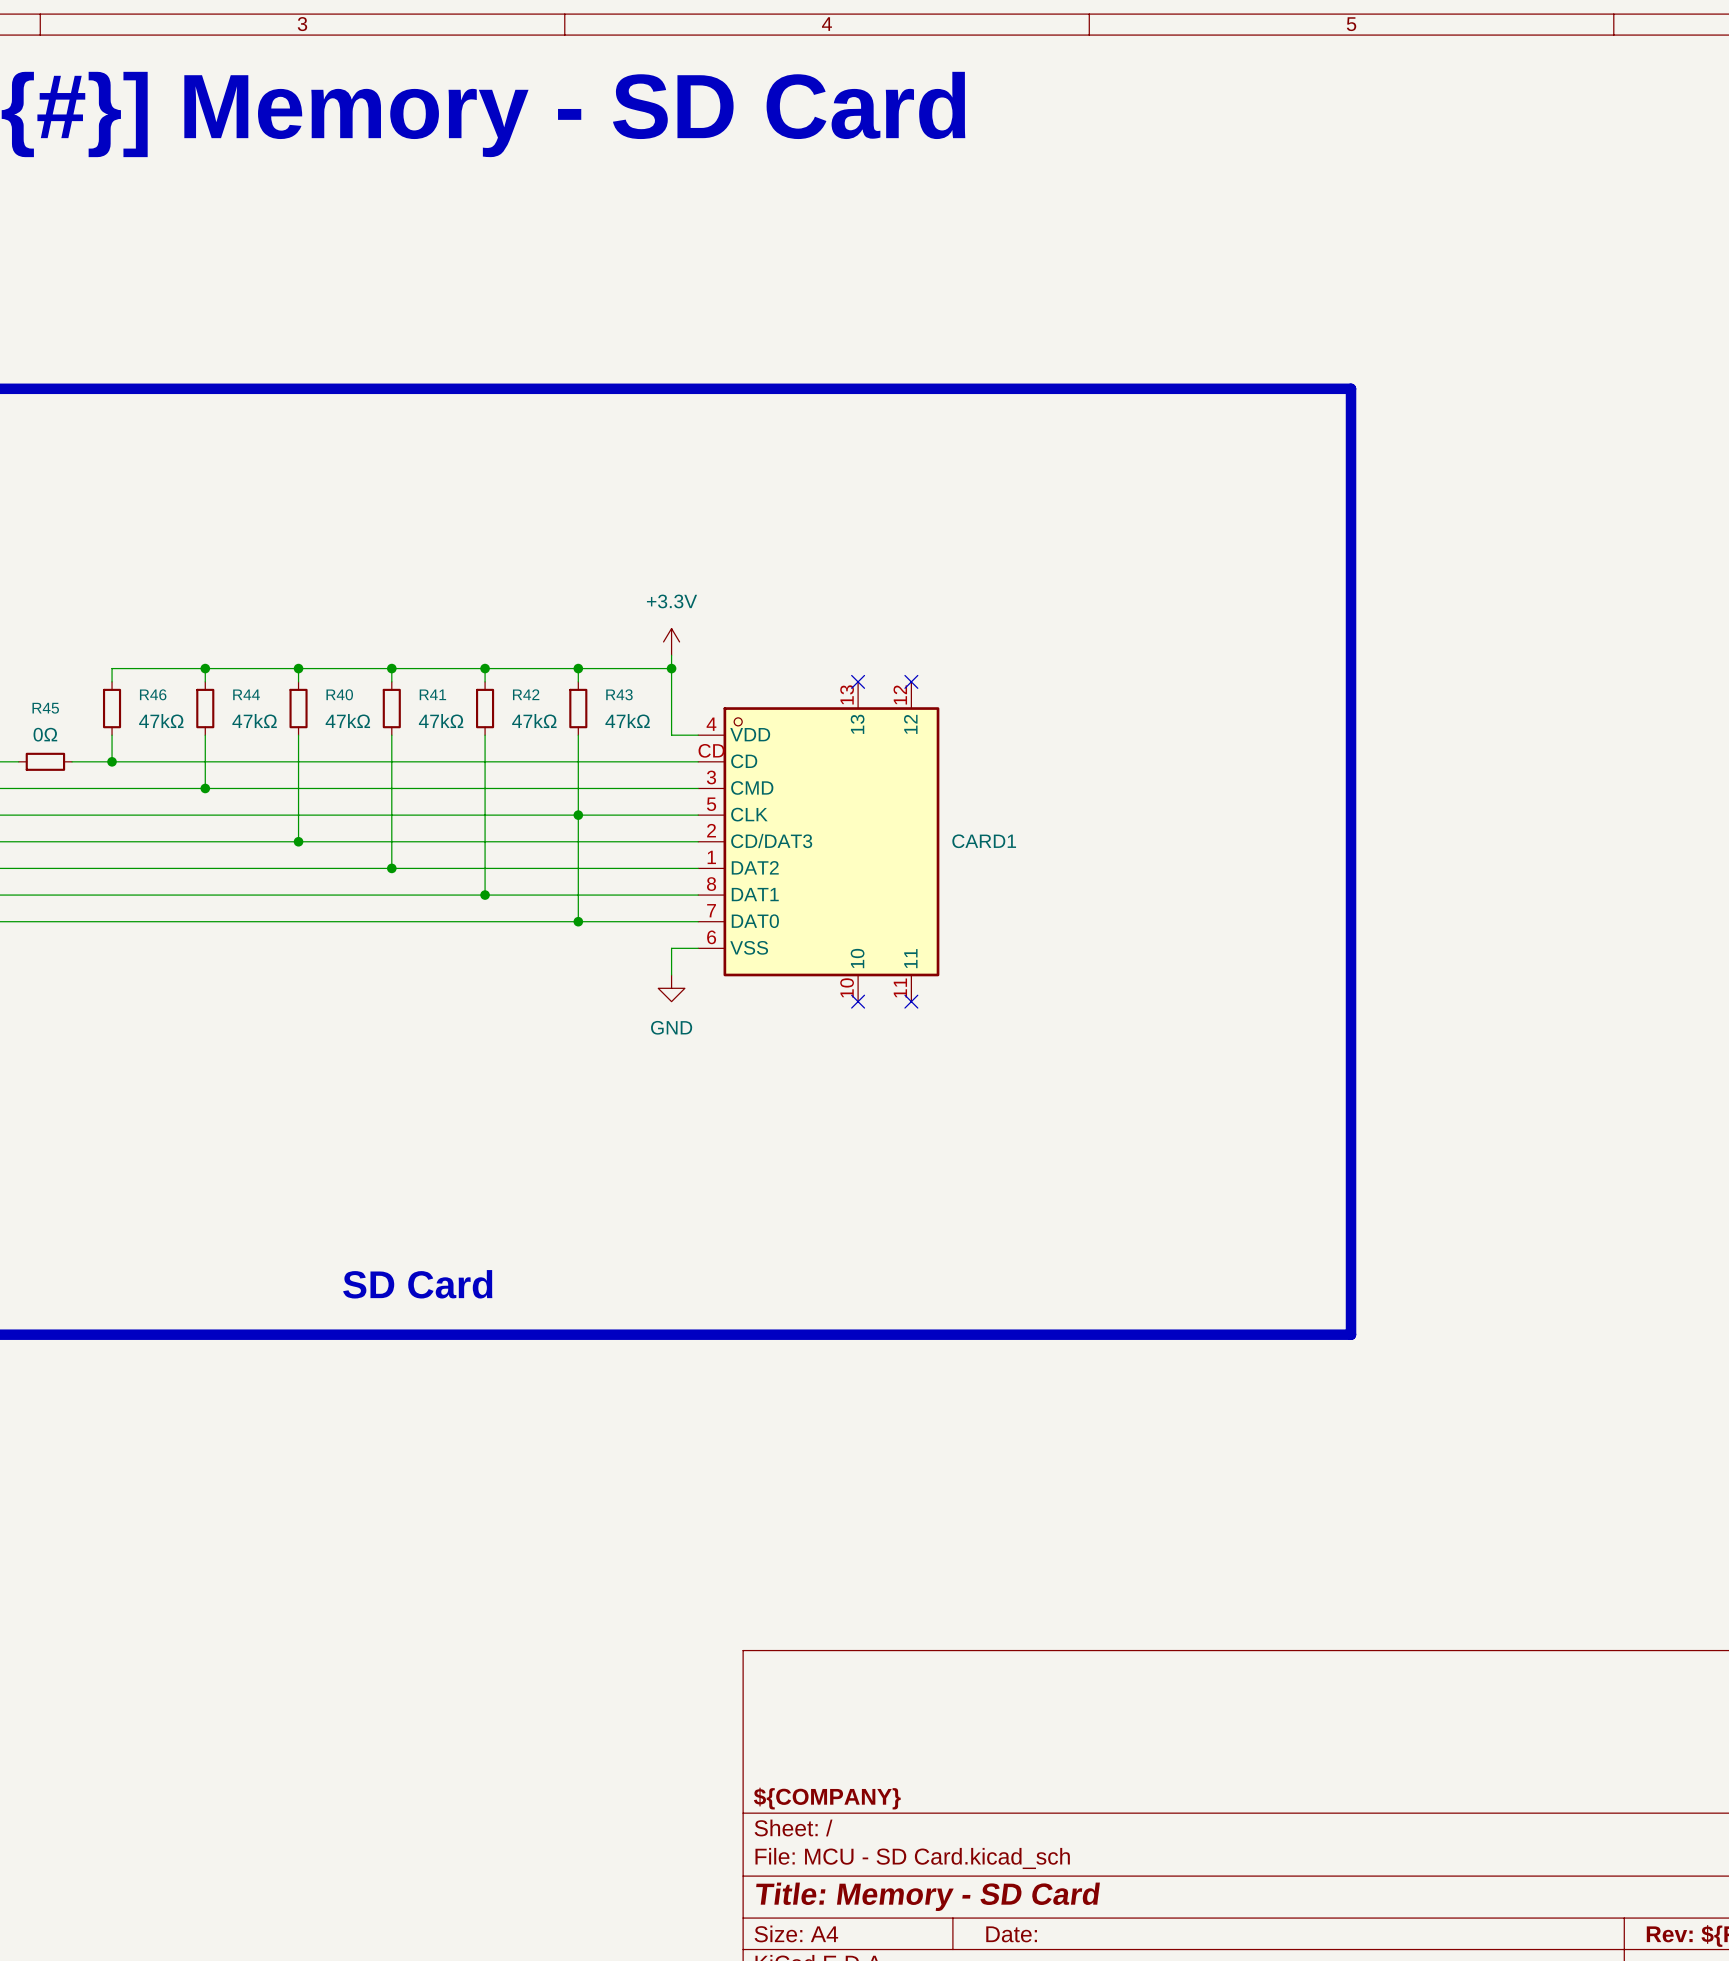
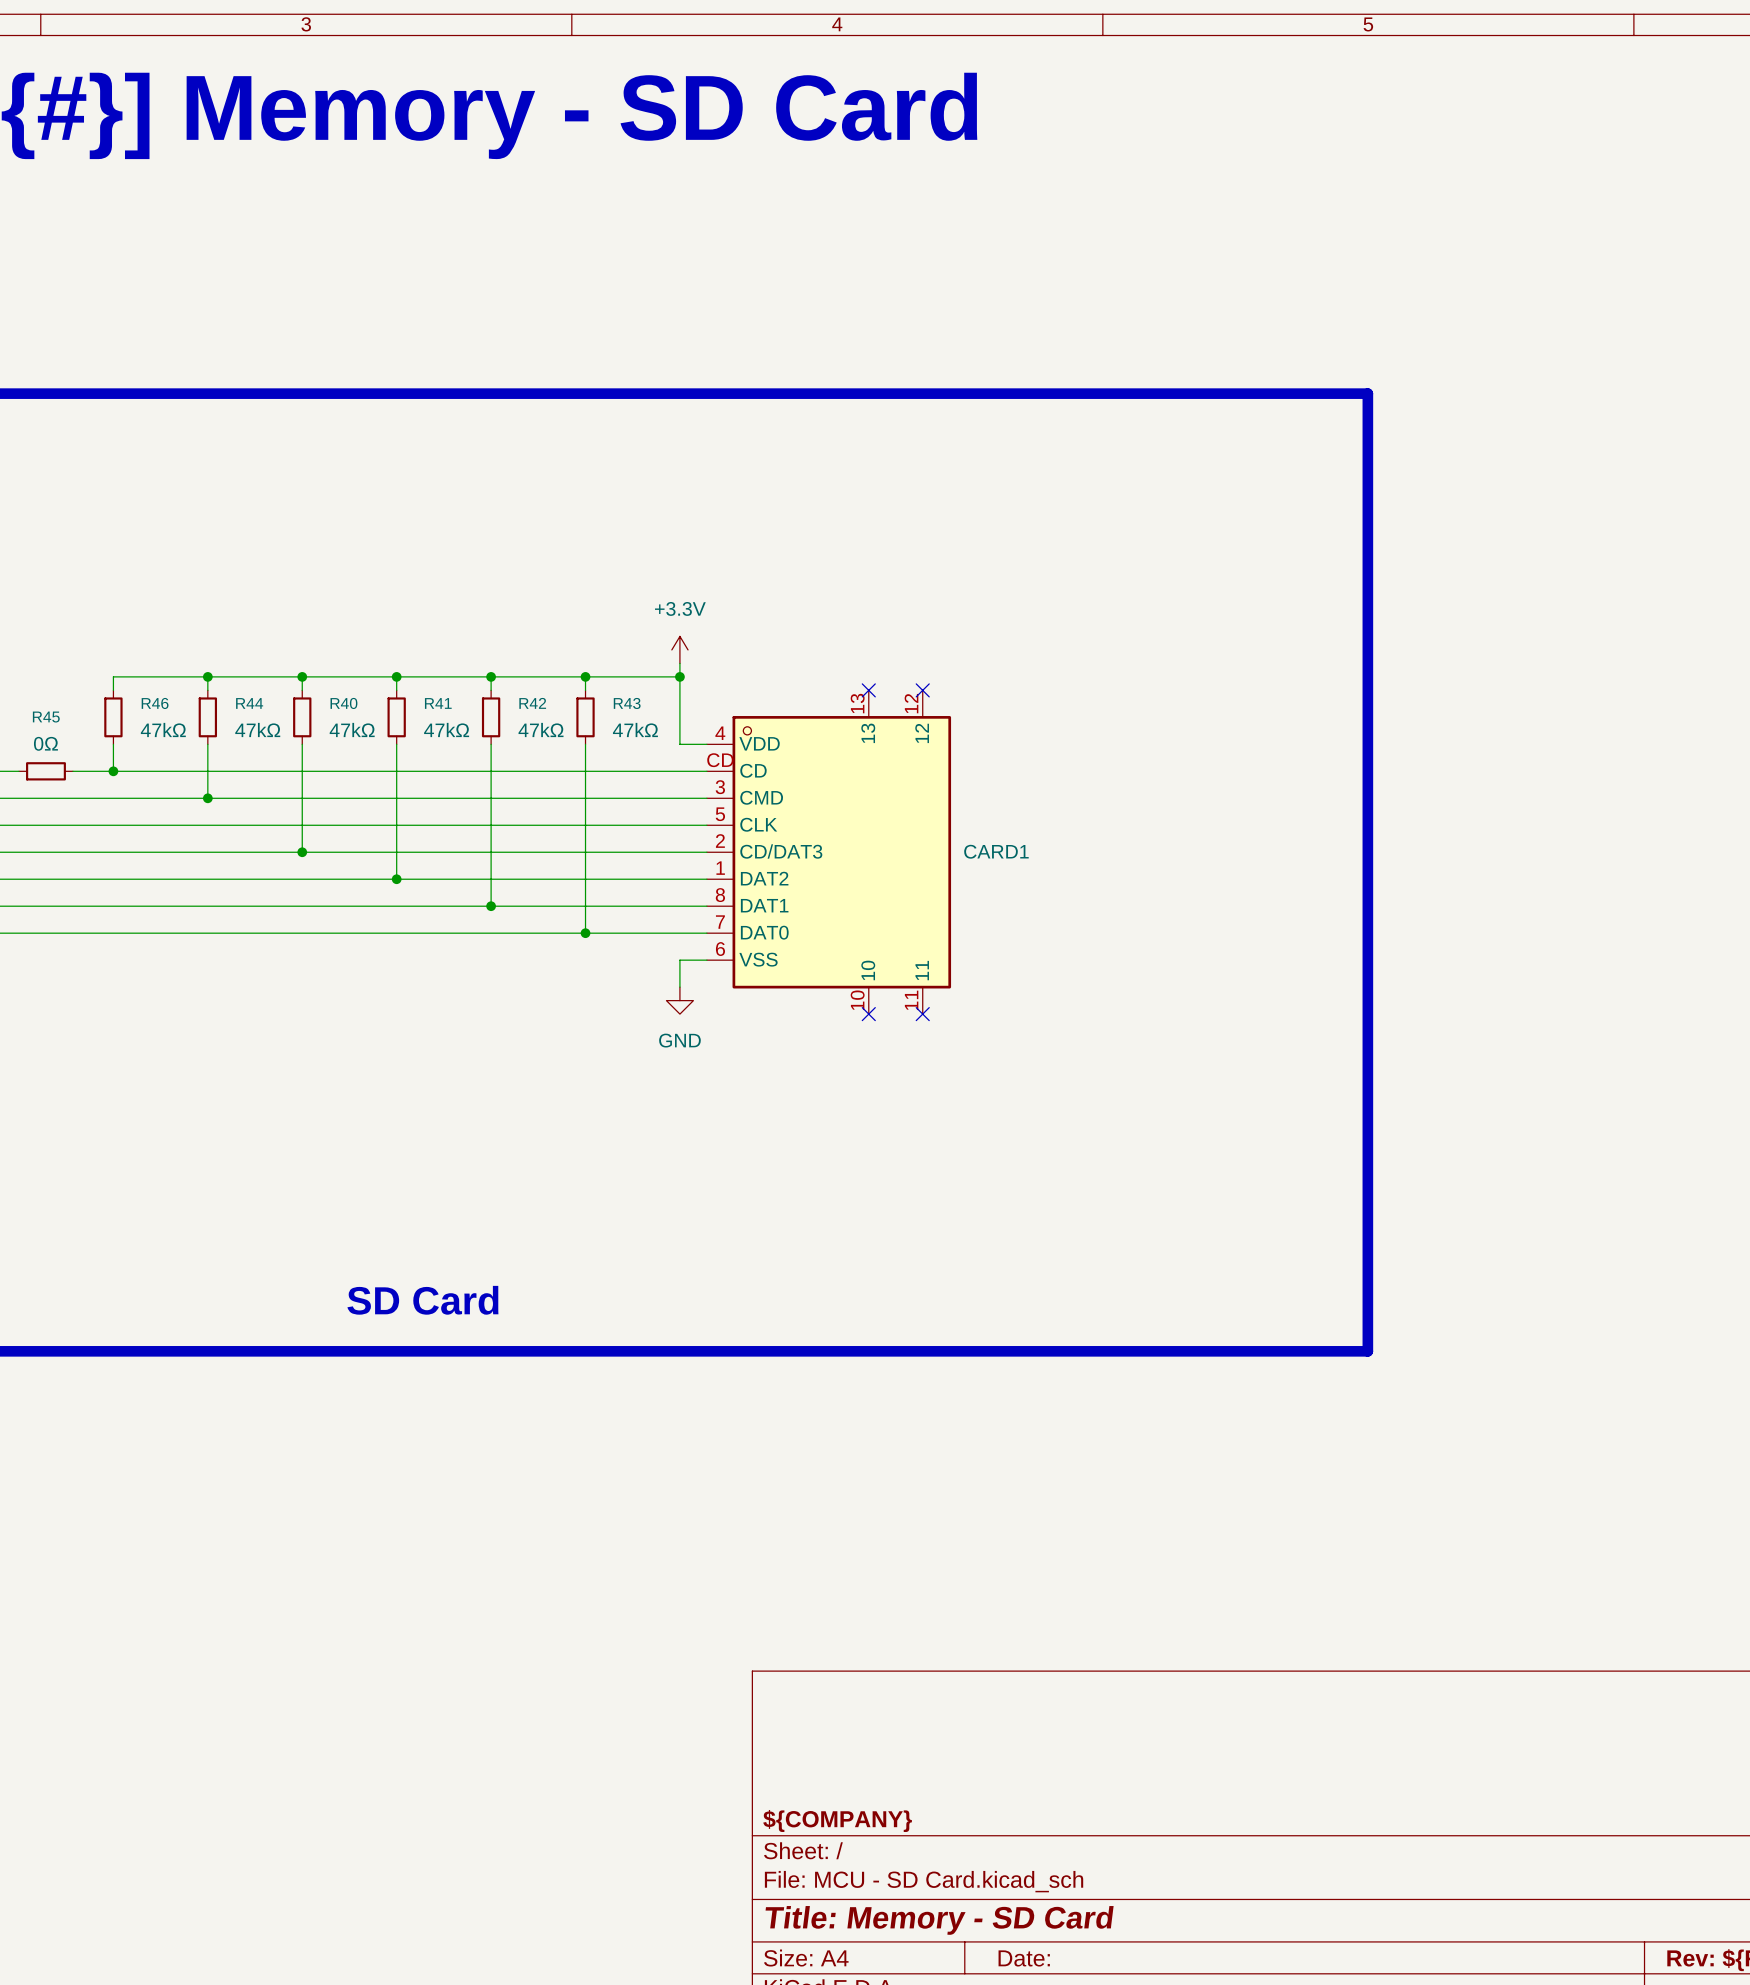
junction: (578, 815) -> none

